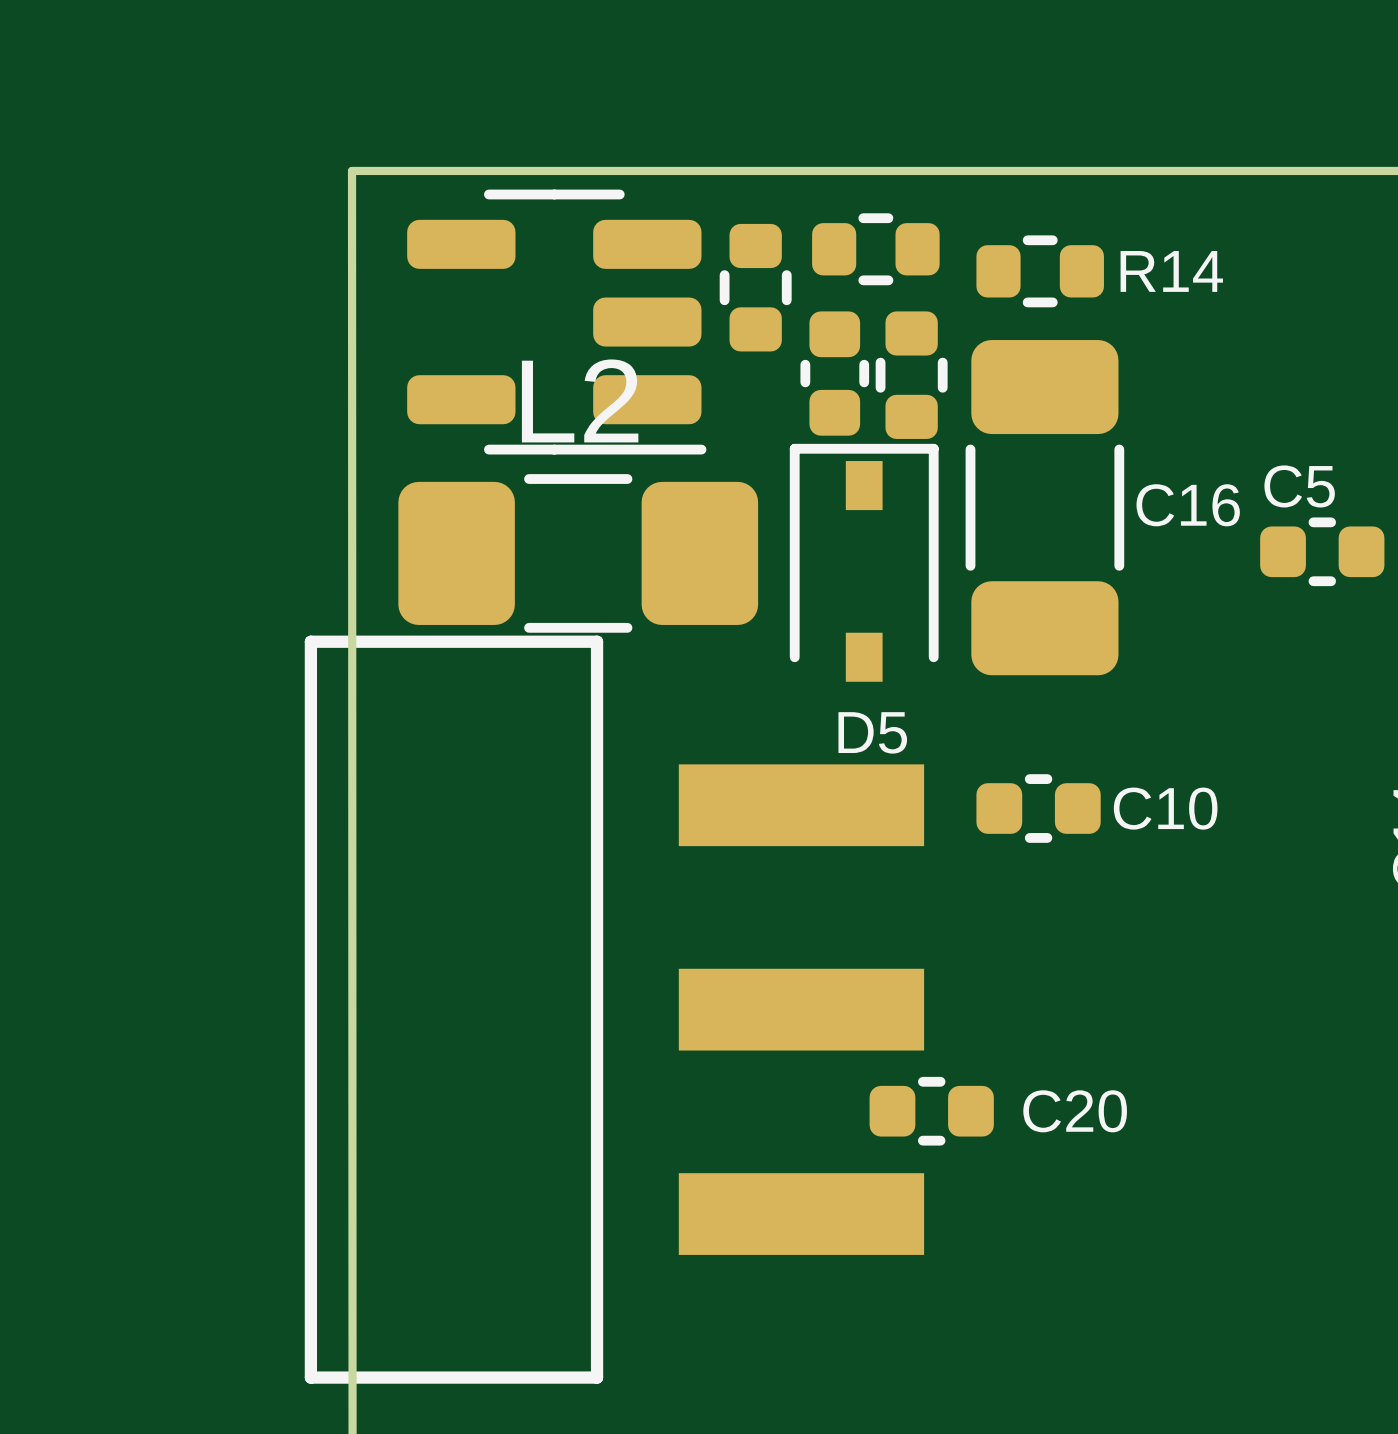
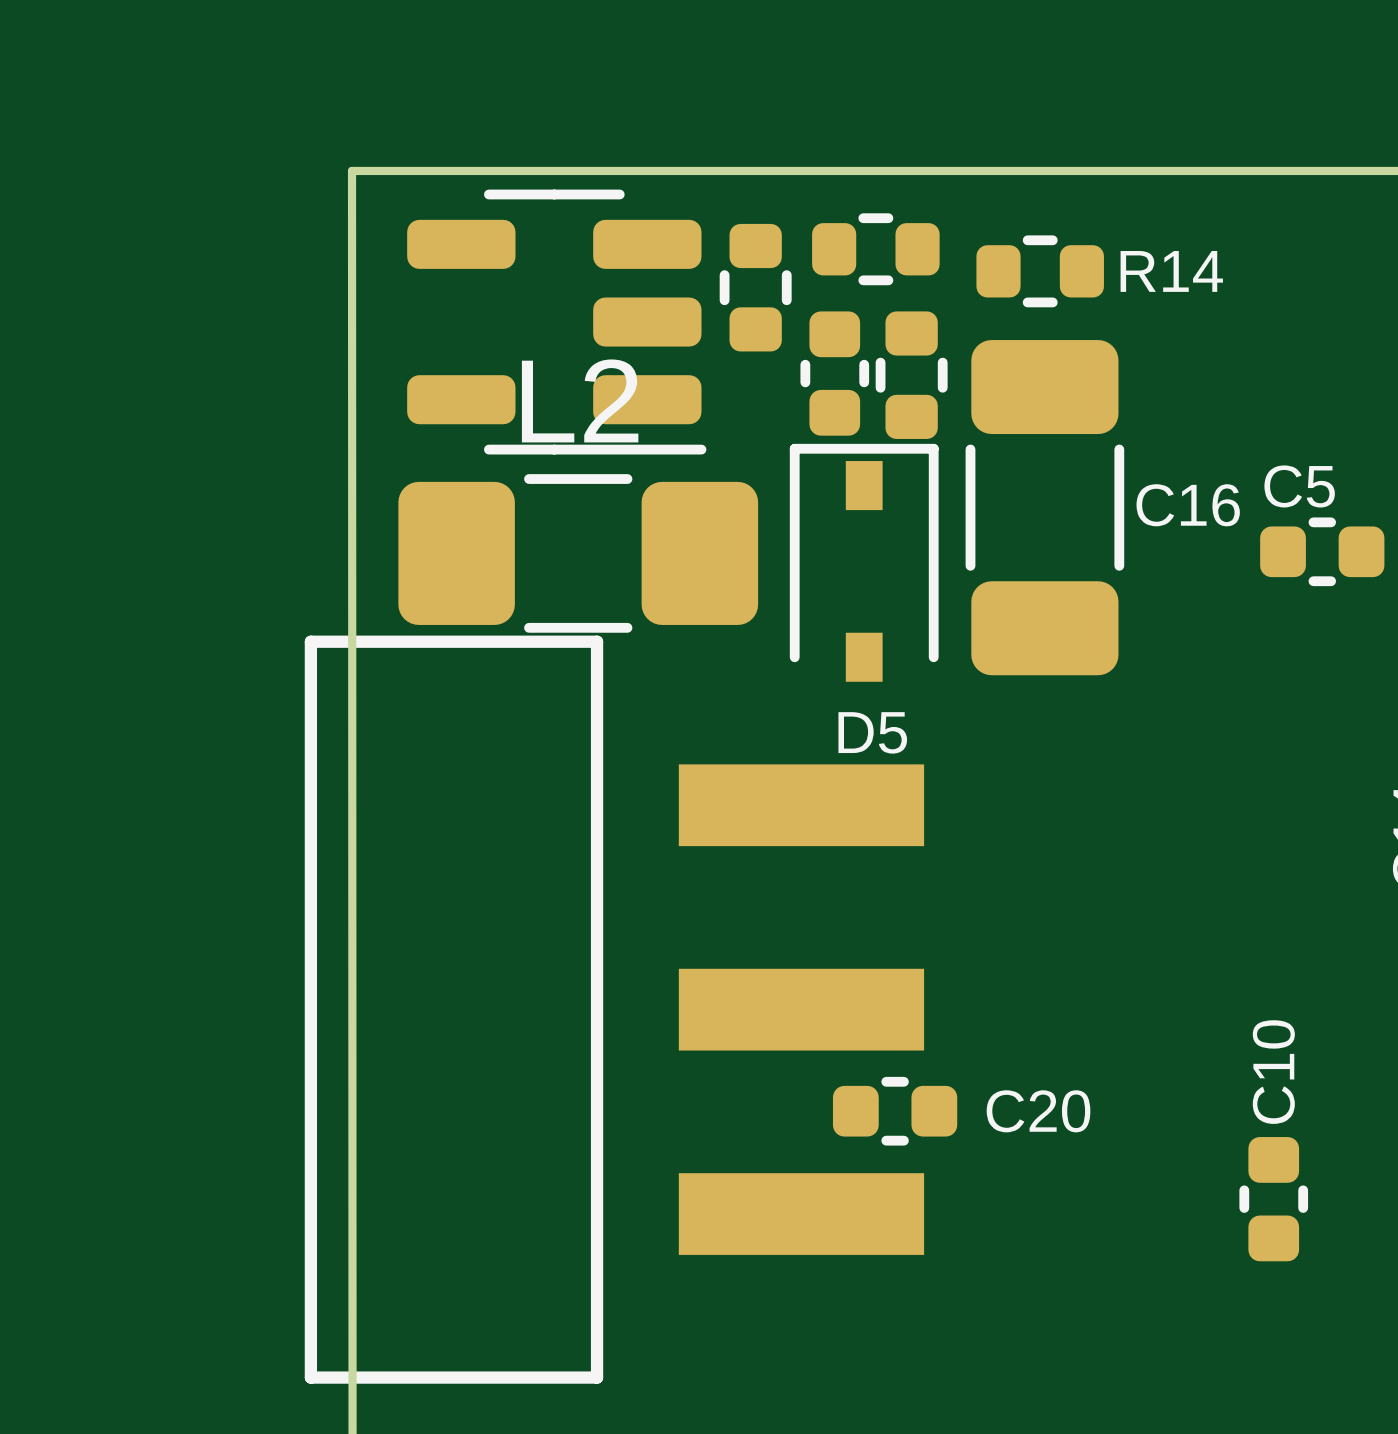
C10 rotation: 0° (1038, 808) -> 90° clockwise (1273, 1199)
C10 position: (1038, 808) -> (1273, 1199)
C10 name position: C10 (1165, 808) -> C10 (1273, 1072)
C20 position: (931, 1111) -> (895, 1111)

